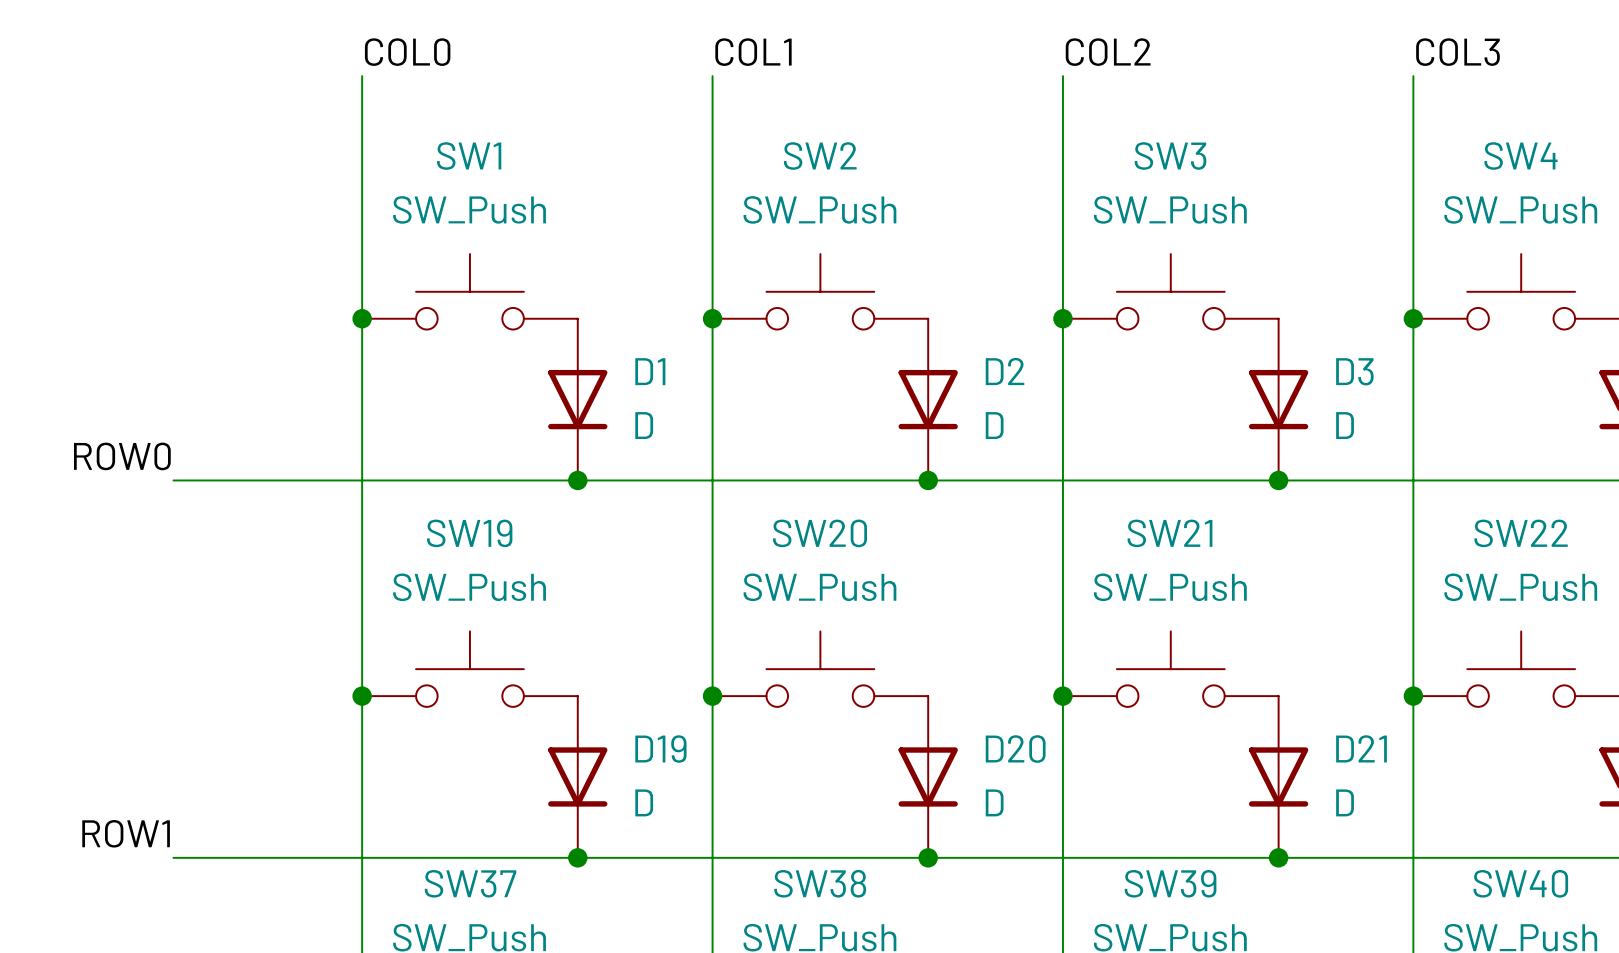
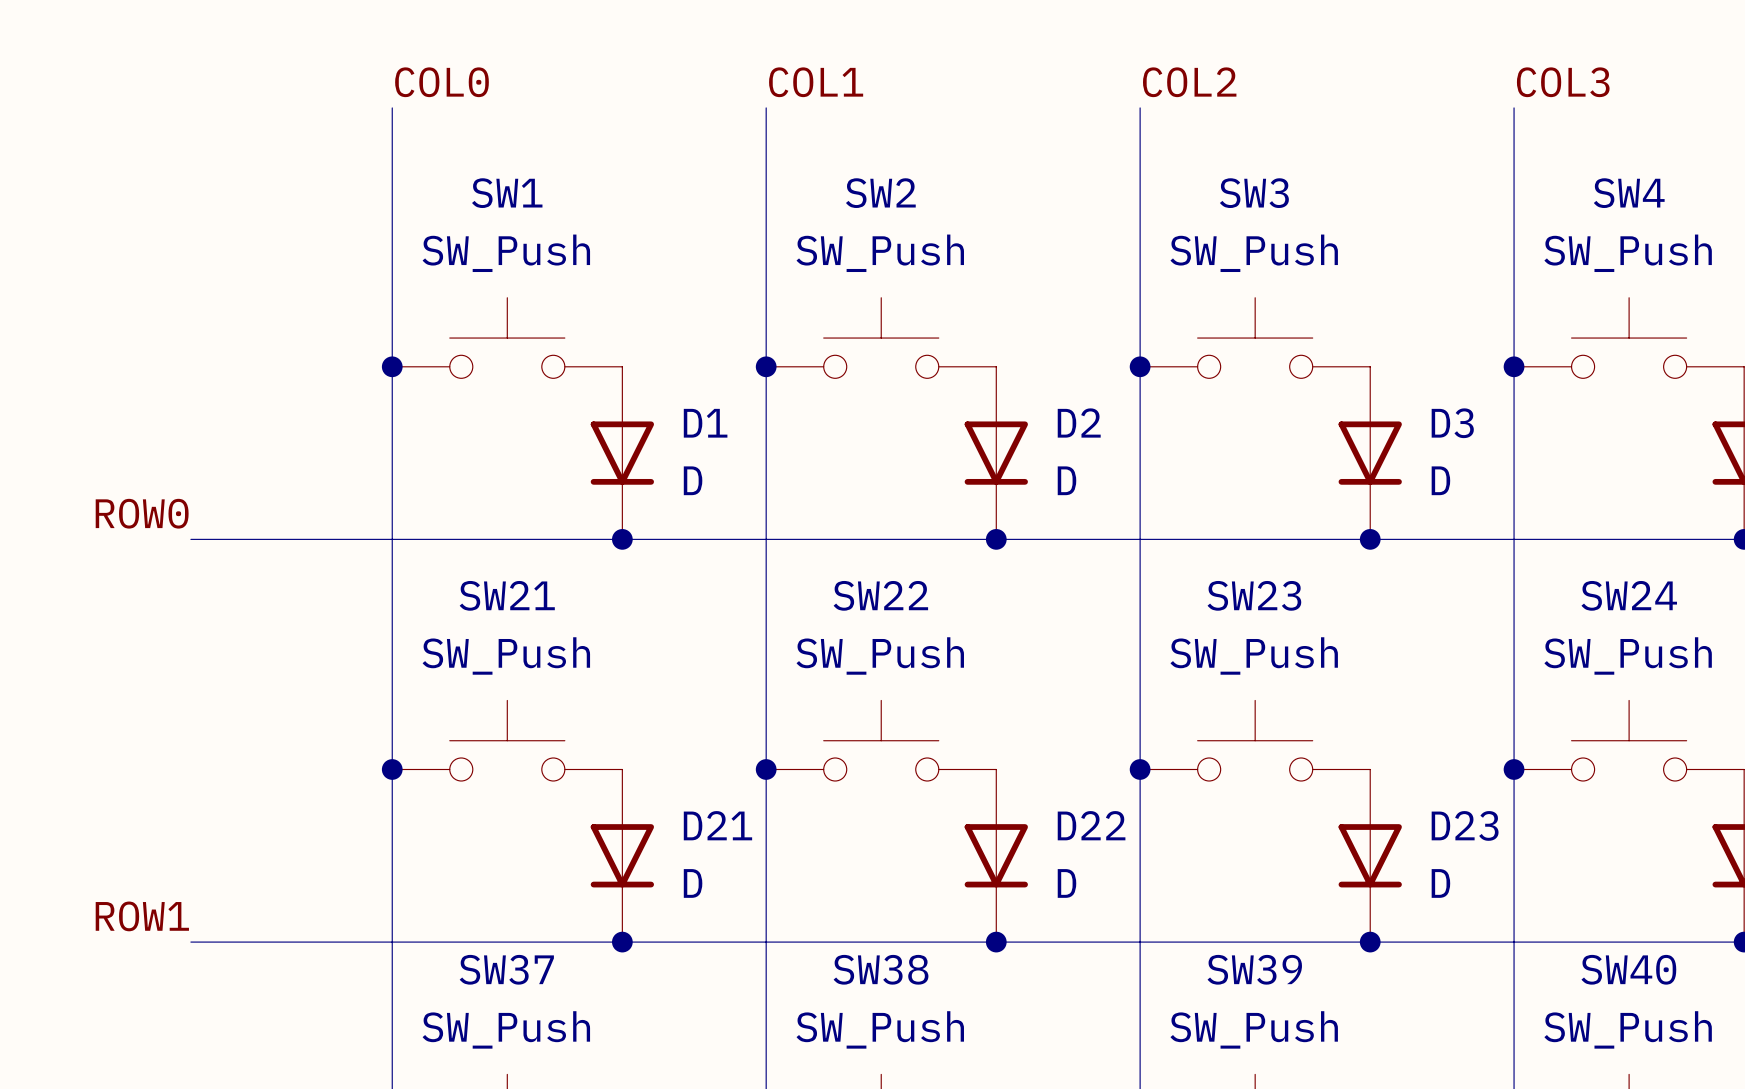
SW19 name: SW19 (469, 533) -> SW21 (507, 595)
SW20 name: SW20 (820, 533) -> SW22 (880, 595)
SW21 name: SW21 (1170, 533) -> SW23 (1254, 595)
SW22 name: SW22 (1521, 533) -> SW24 (1629, 595)
D21 name: D21 (1361, 748) -> D23 (1465, 825)
D19 name: D19 (660, 749) -> D21 (717, 825)
D20 name: D20 (1015, 749) -> D22 (1091, 825)

